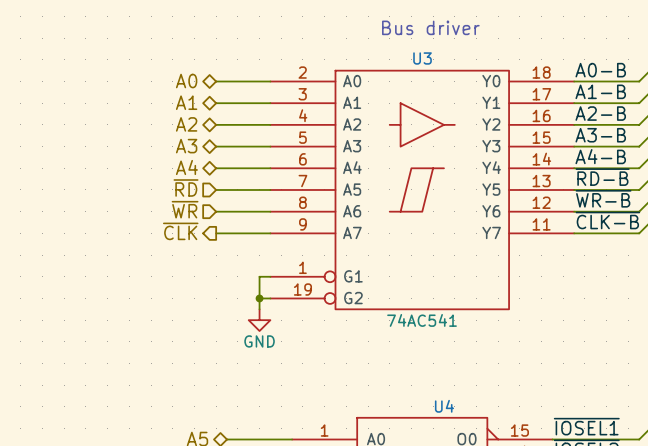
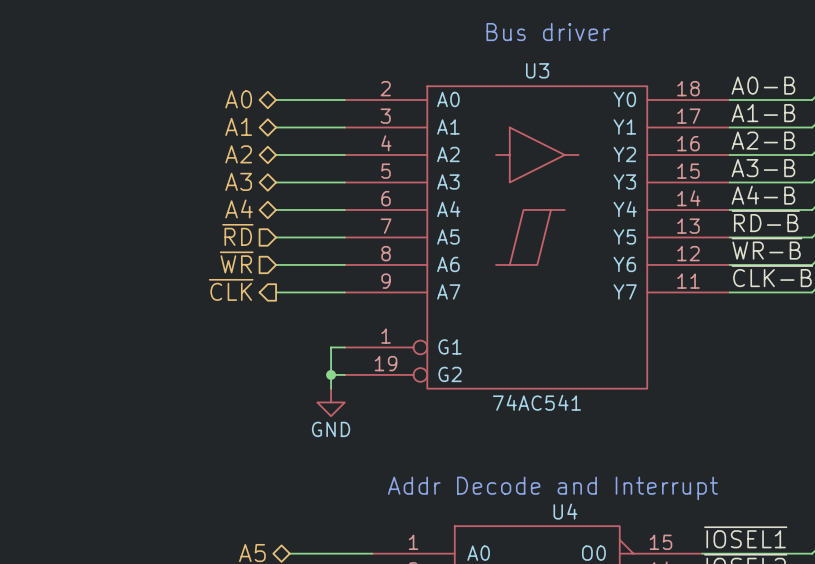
text: none -> Addr Decode and Interrupt (552, 488)

